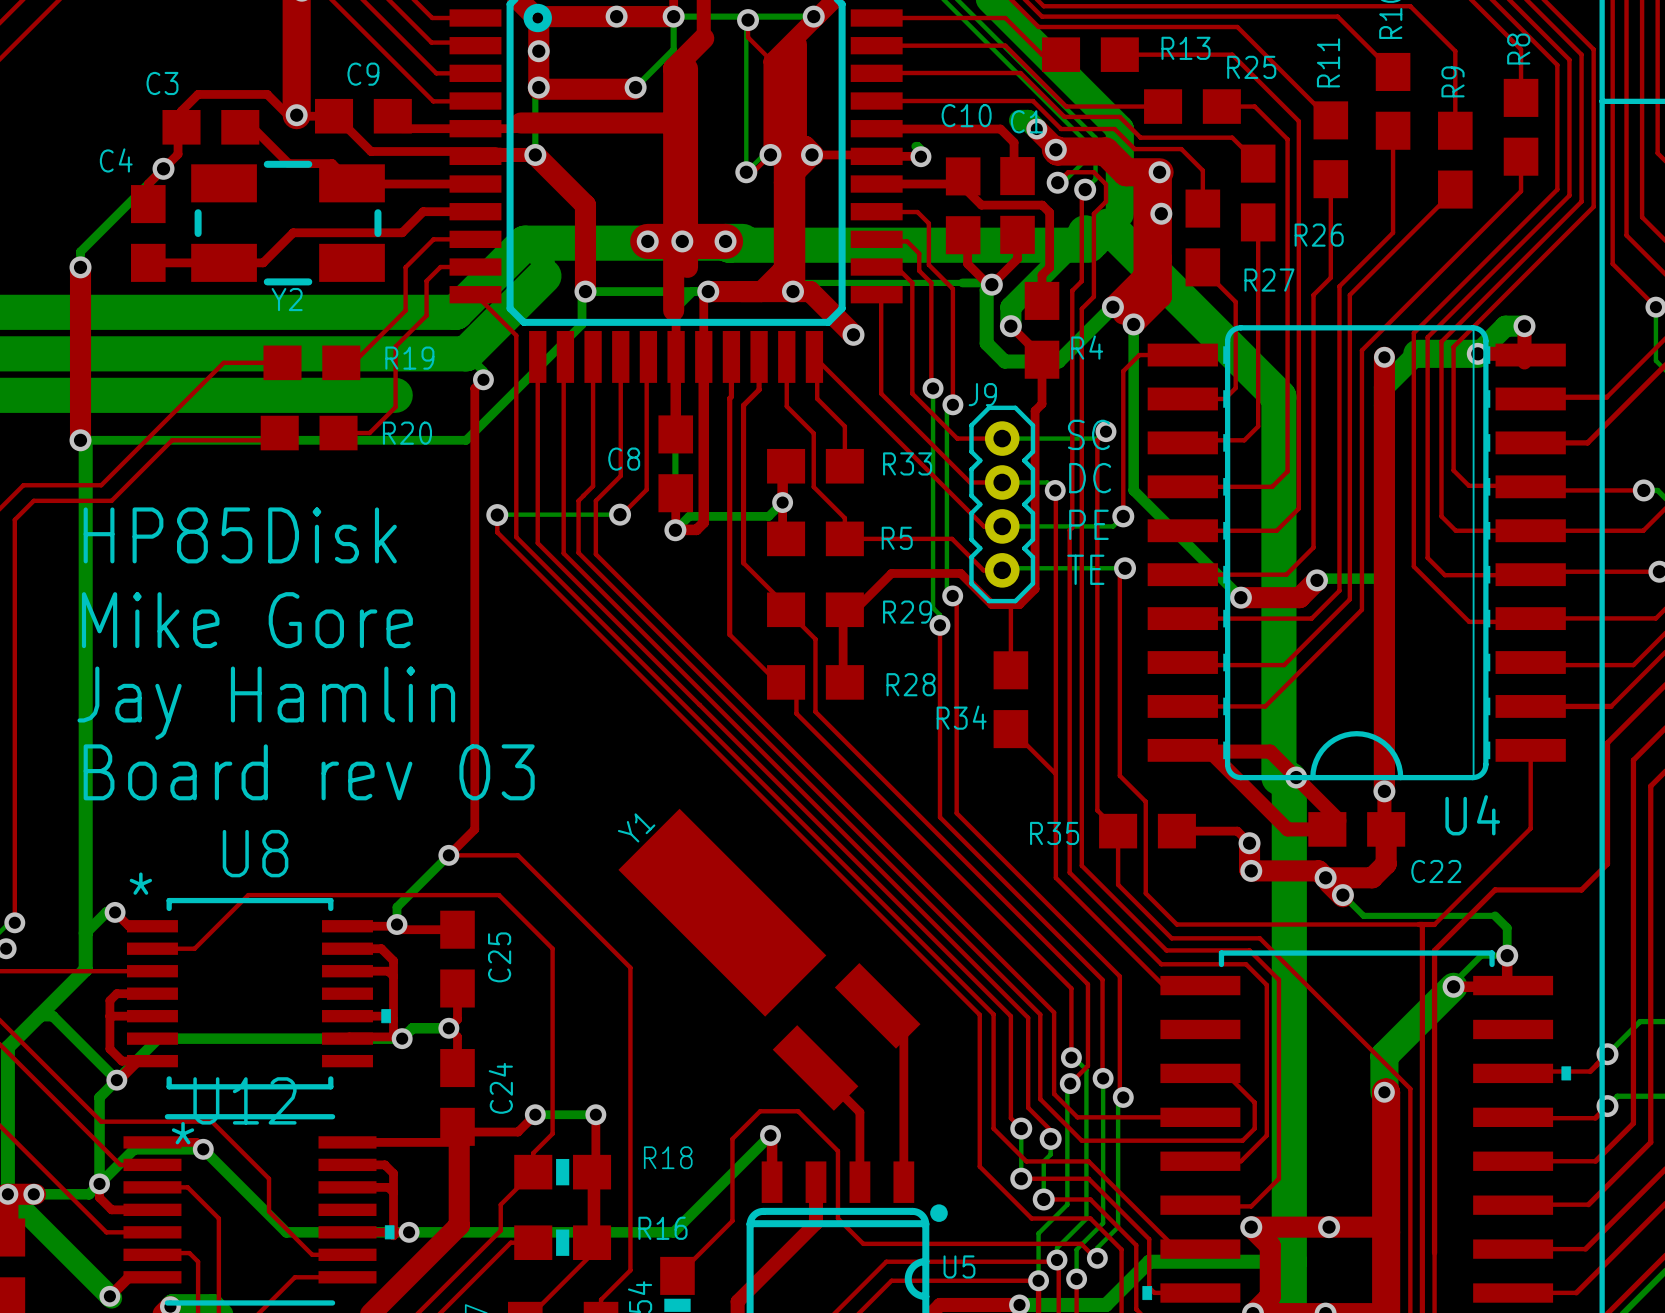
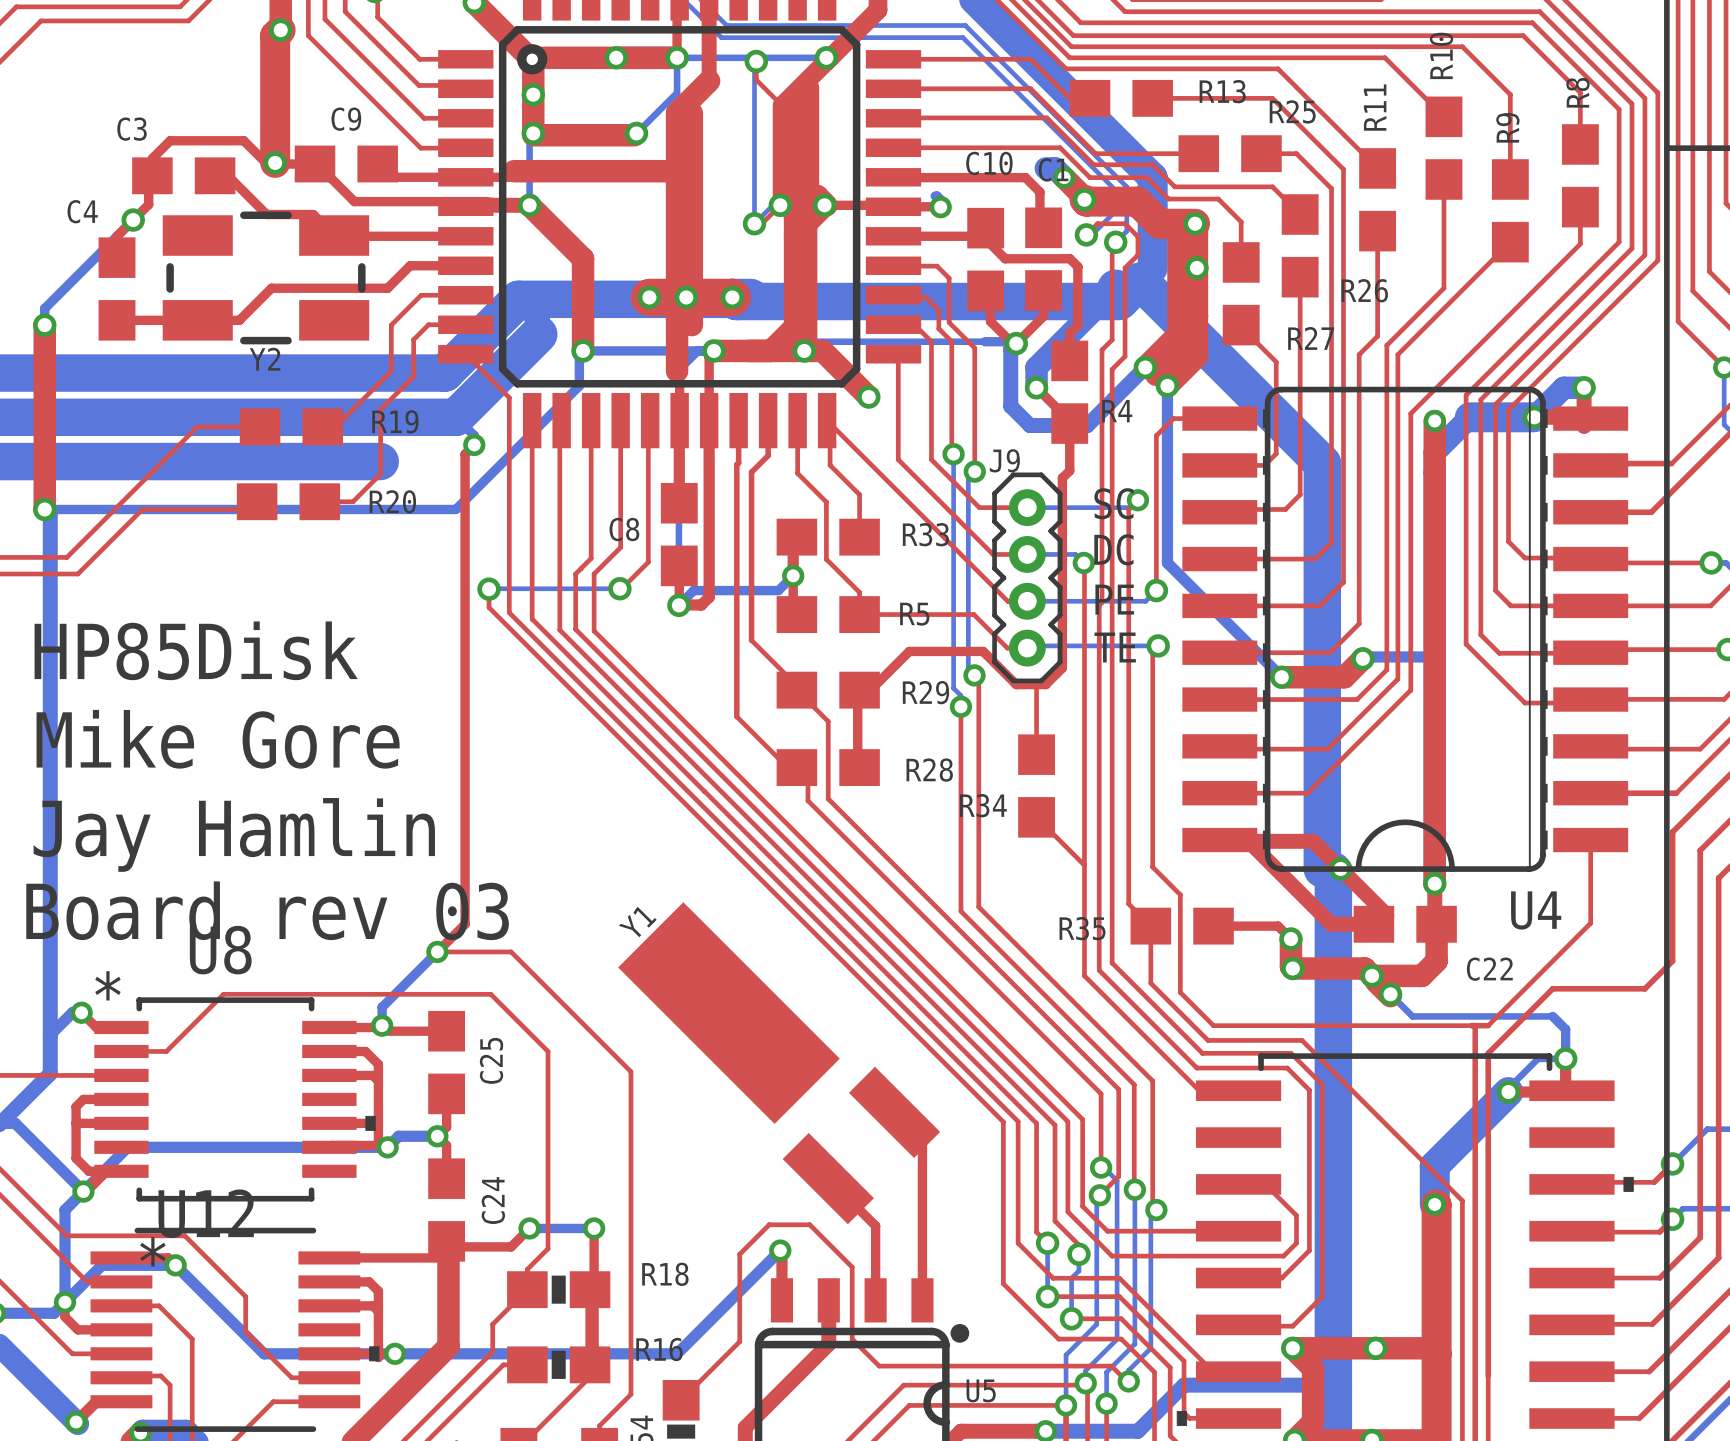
text position: HP85Disk (240, 535) -> HP85Disk (196, 650)
text position: Mike Gore (247, 620) -> Mike Gore (218, 739)
text position: Jay Hamlin (266, 703) -> Jay Hamlin (234, 834)
text position: Board rev 03 (309, 772) -> Board rev 03 (267, 910)

